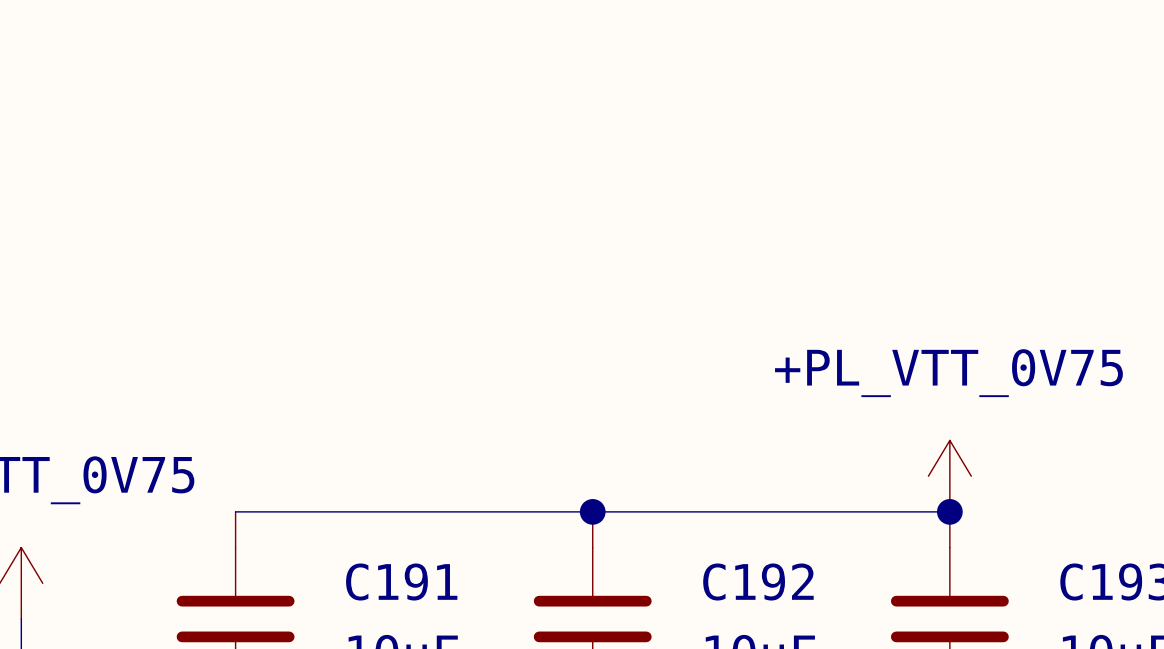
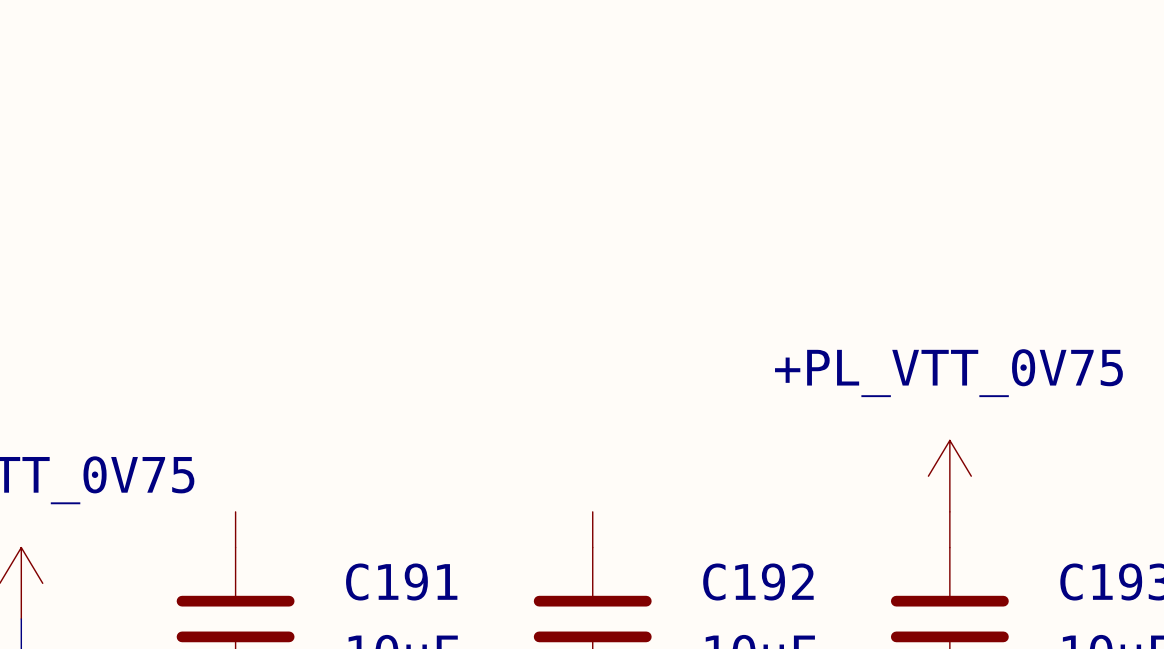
wire: (235, 511) (949, 511) -> none
junction: (592, 511) -> none
junction: (949, 511) -> none

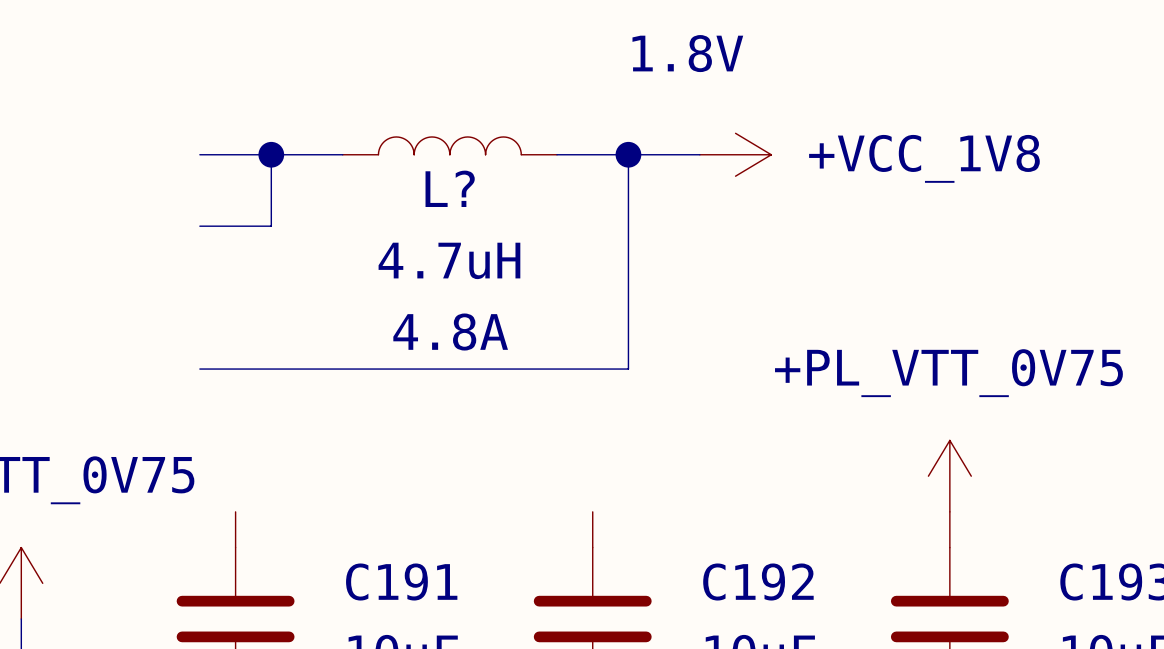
text: none -> 1.8V (687, 53)
L?: none -> (449, 145)
wire: none -> (199, 154) (342, 154)
wire: none -> (271, 154) (271, 226) (199, 226)
junction: none -> (271, 154)
wire: none -> (557, 154) (699, 154)
wire: none -> (628, 154) (628, 369) (199, 369)
junction: none -> (628, 154)
power symbol: none -> +VCC_1V8 (735, 154)

